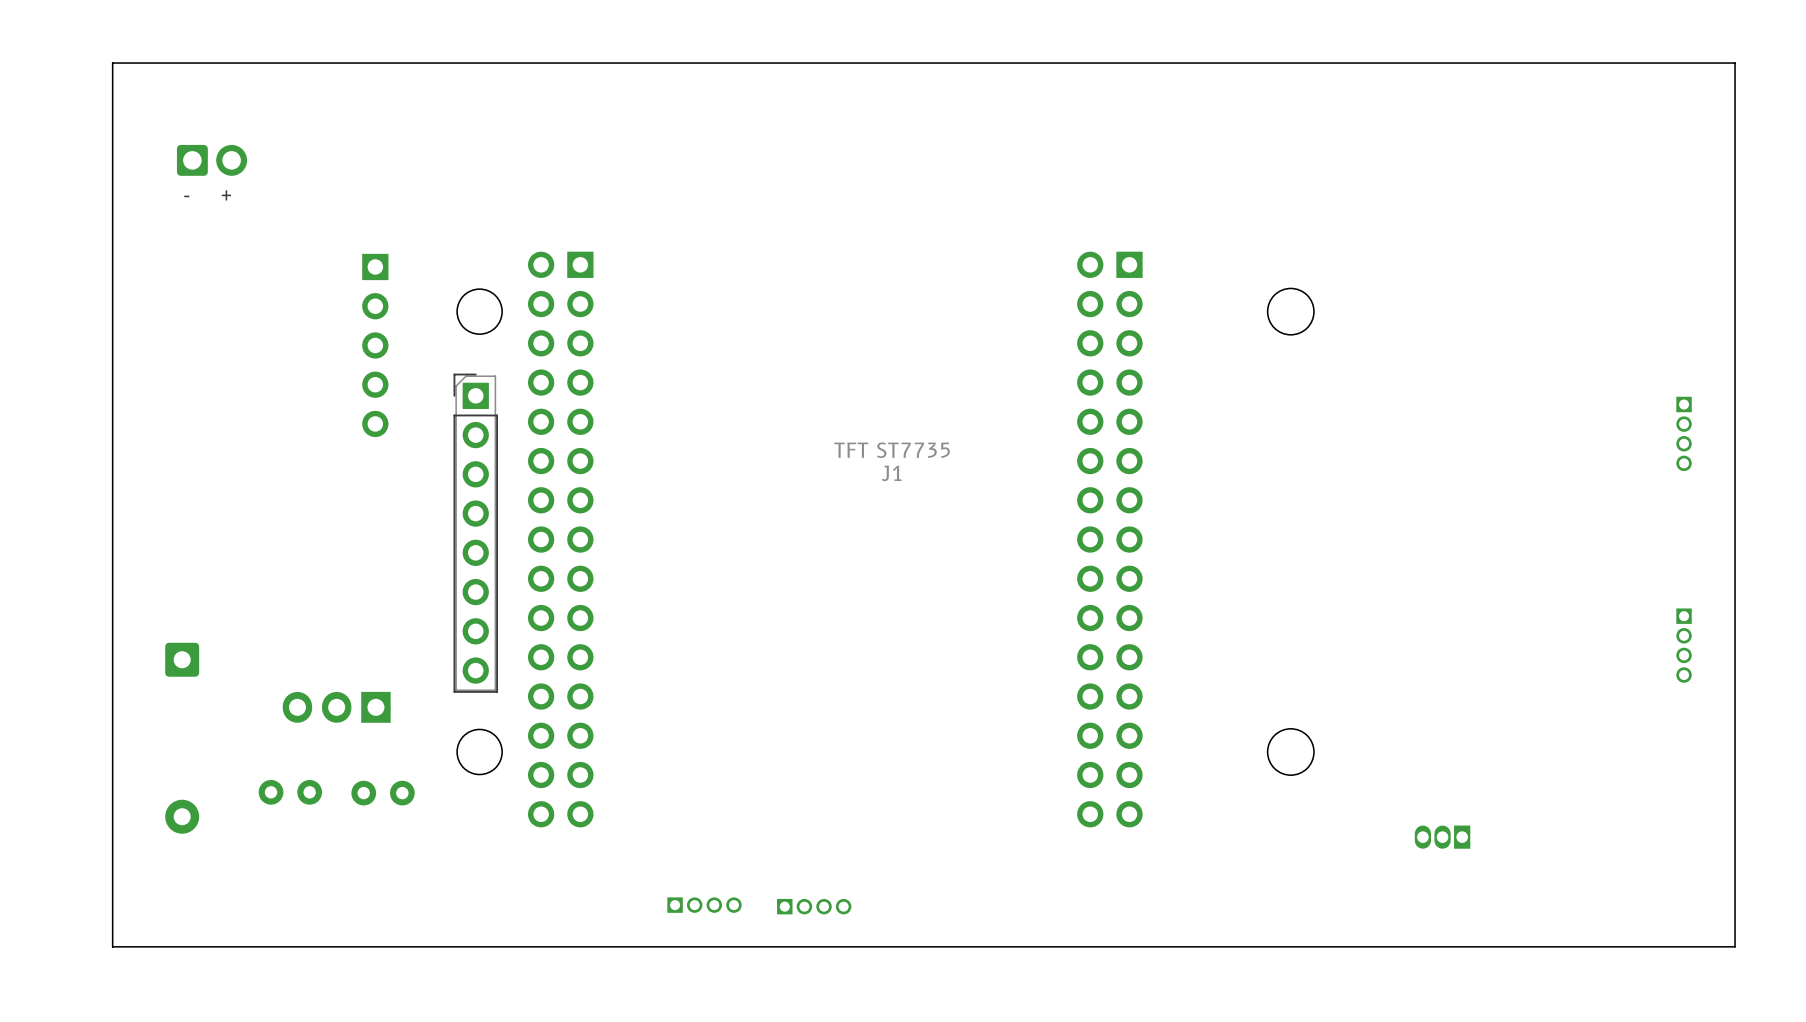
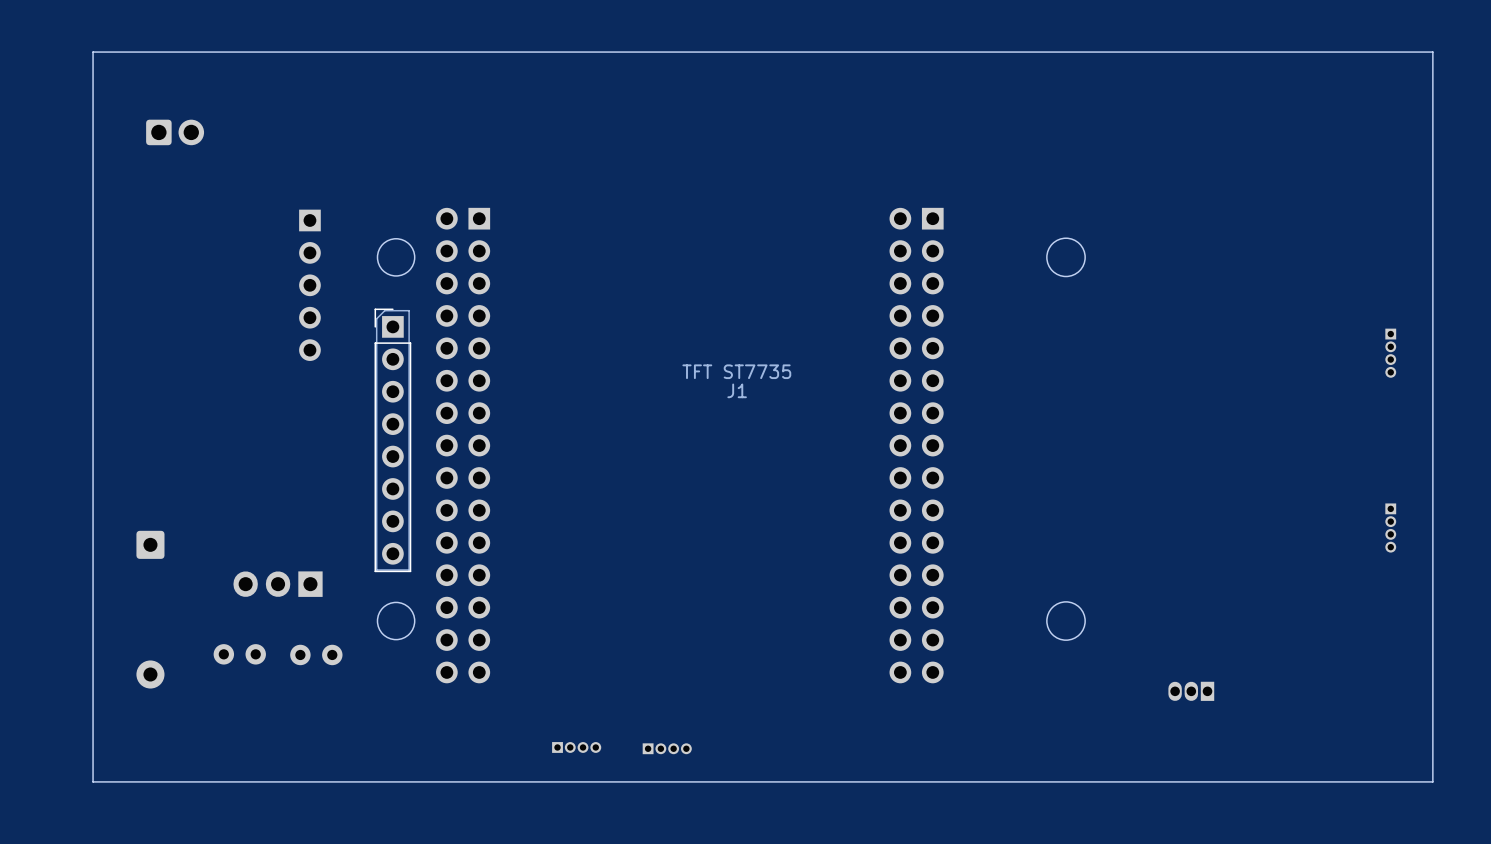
text: + (226, 195) -> none
text: - (186, 196) -> none
part footprint: [1676, 396, 1692, 472] -> [1385, 328, 1397, 378]
part footprint: [1676, 608, 1692, 683] -> [1385, 503, 1397, 553]
part footprint: [667, 897, 742, 913] -> [552, 742, 602, 753]
part footprint: [777, 898, 852, 915] -> [642, 743, 692, 755]

